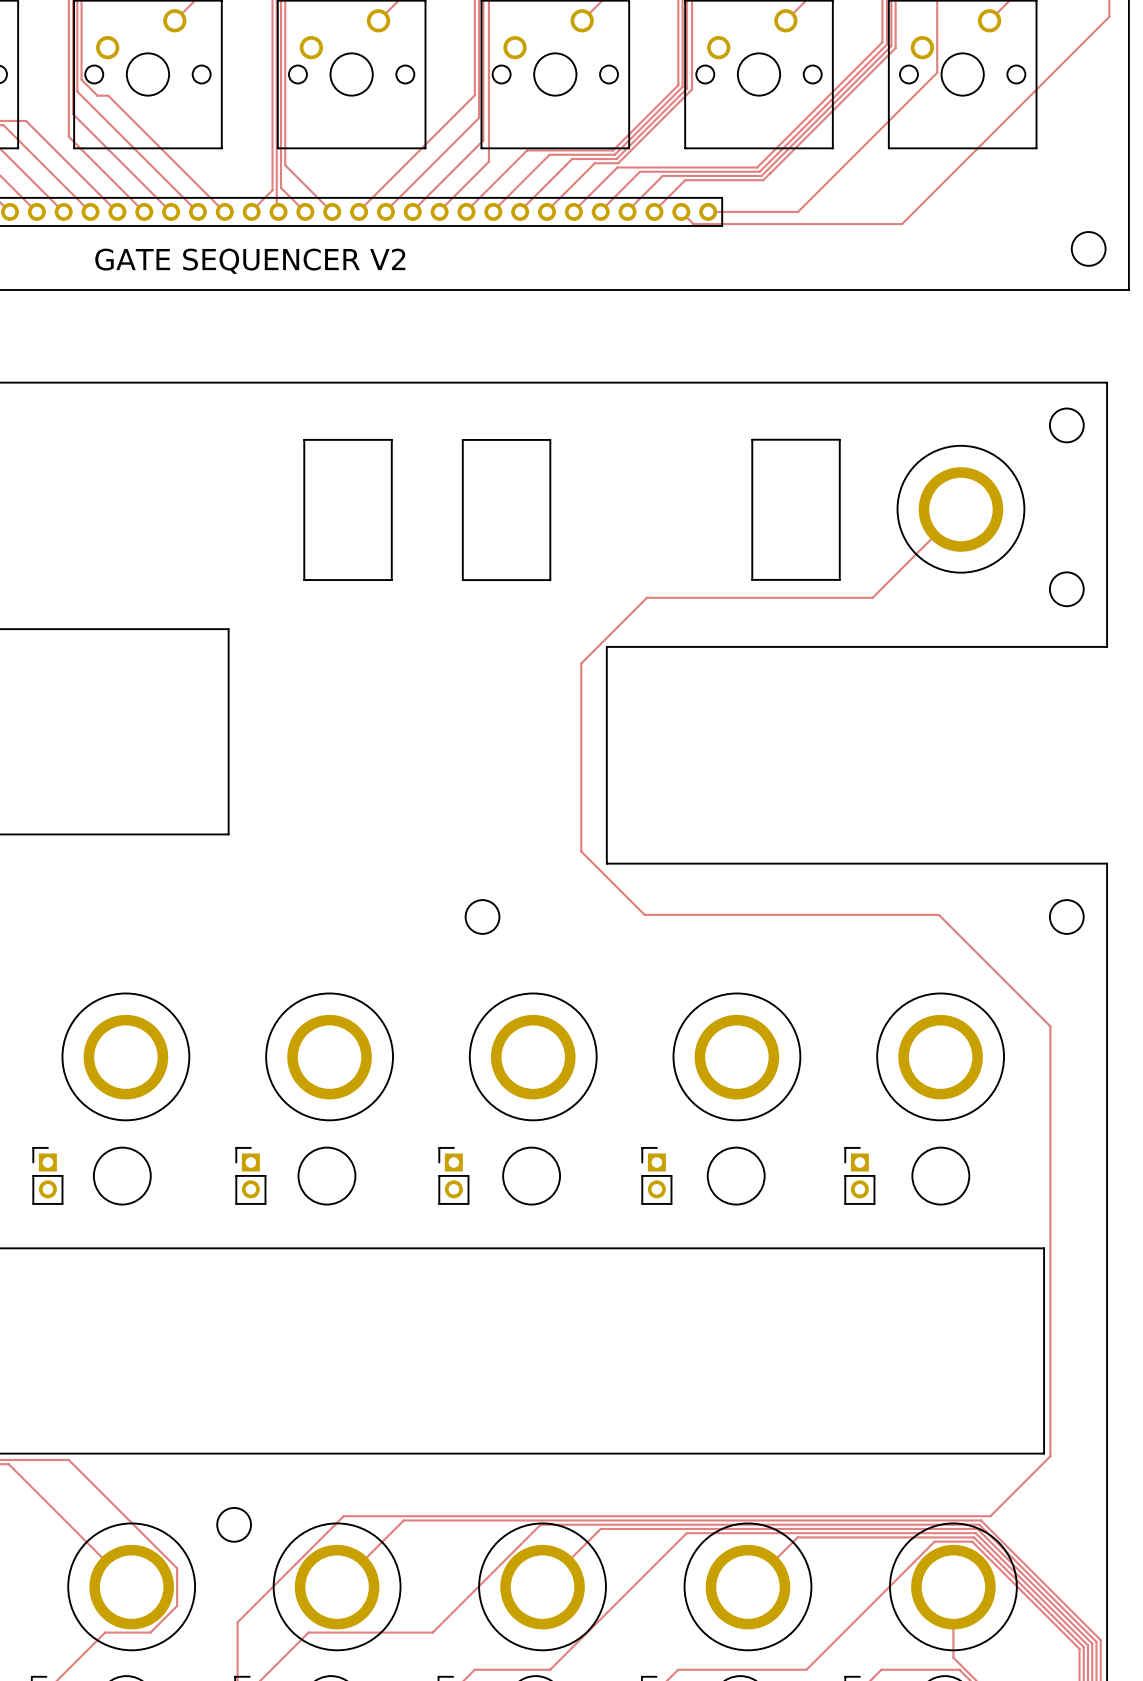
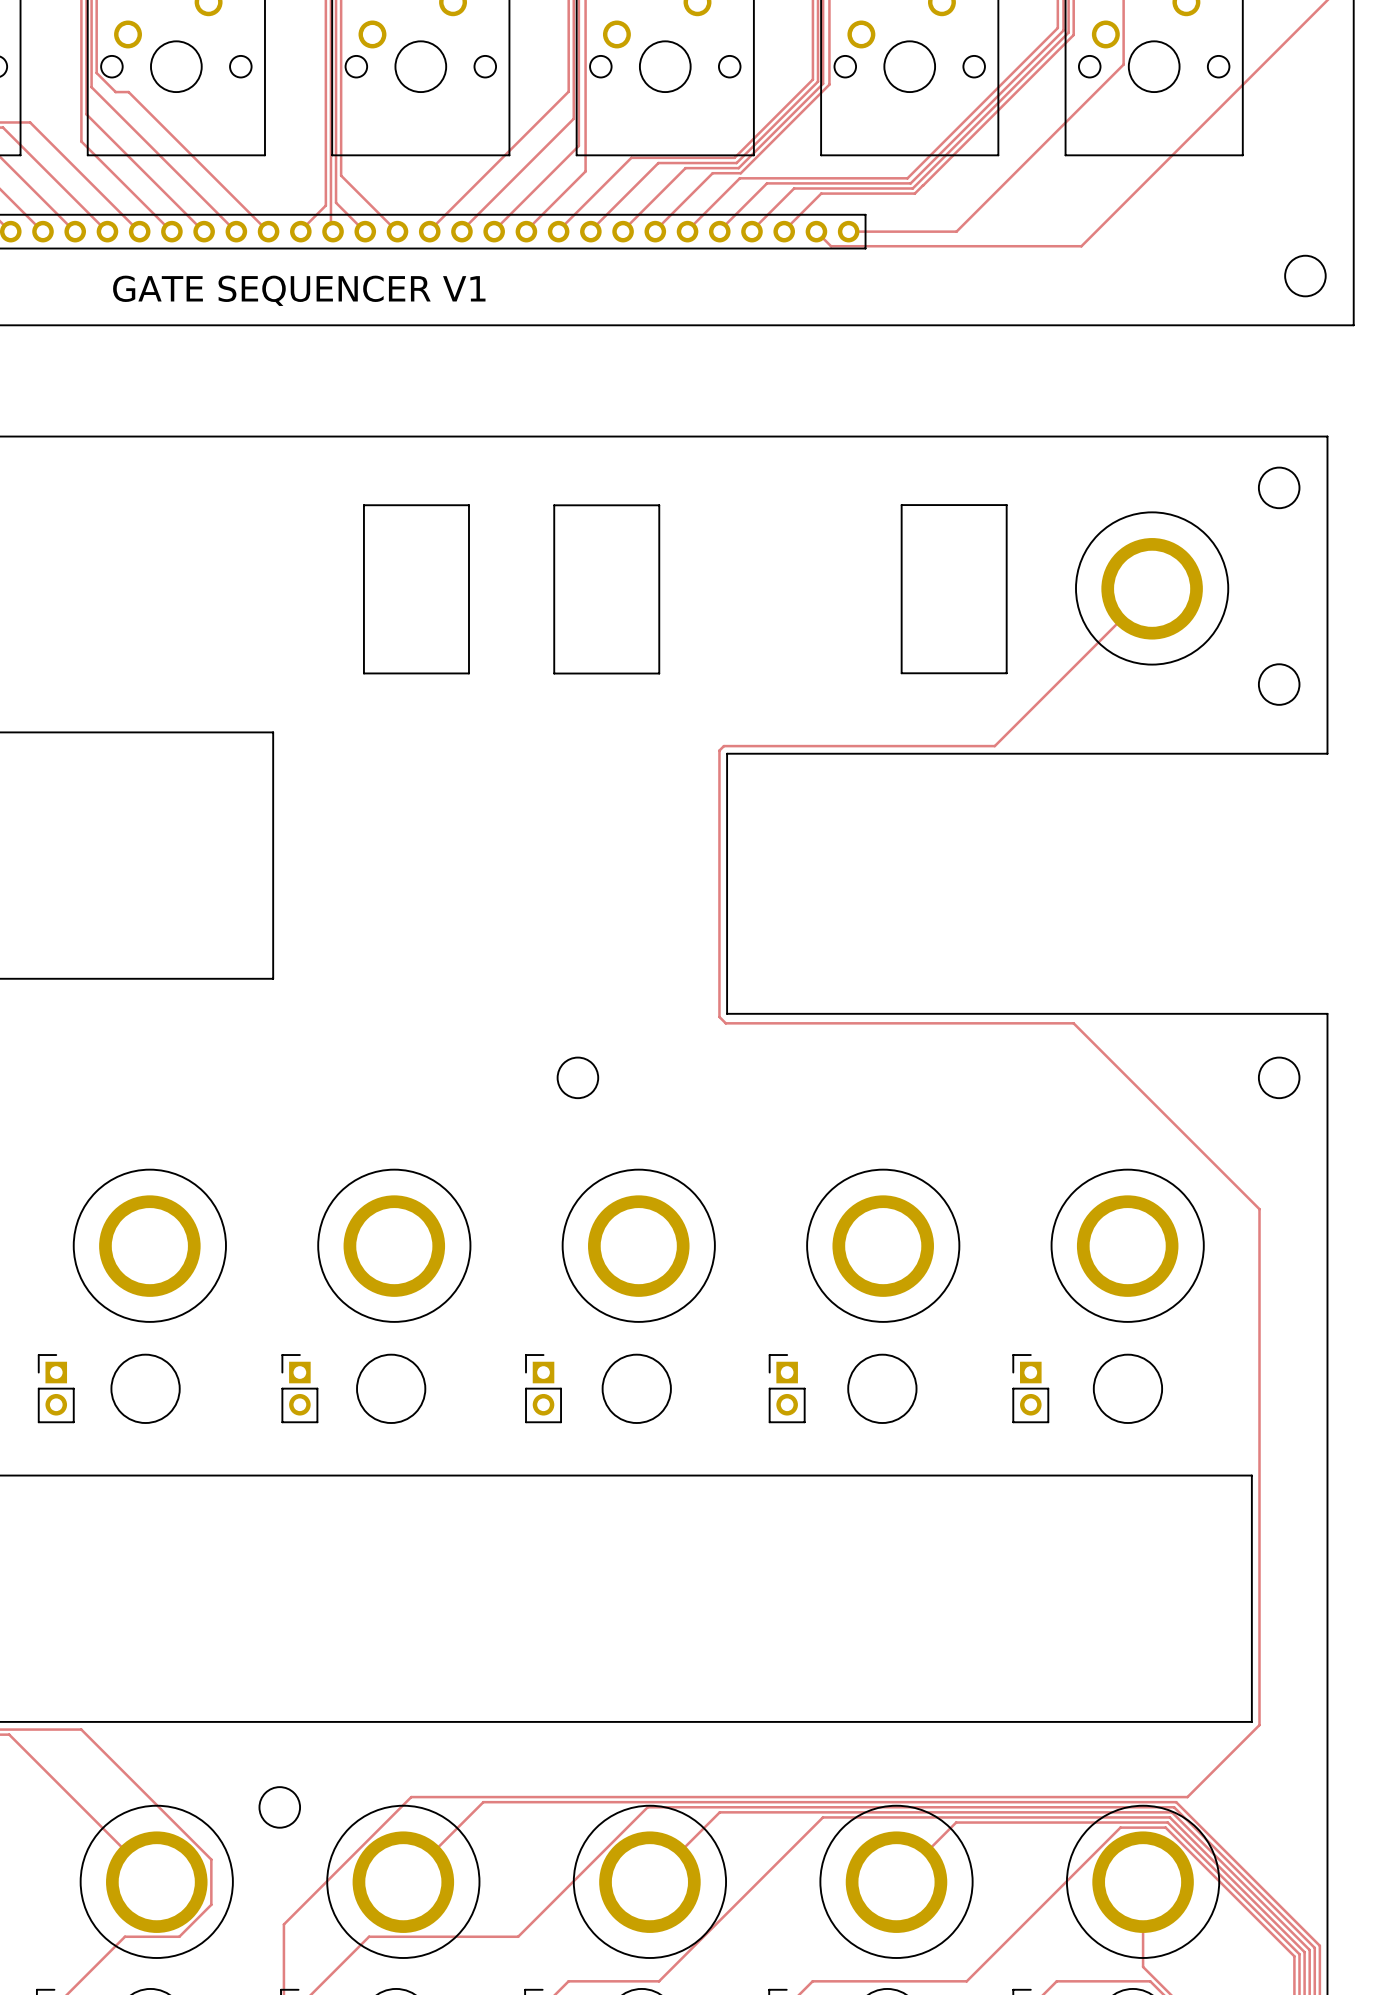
text: GATE SEQUENCER V2 (250, 261) -> GATE SEQUENCER V1 (299, 290)
track: (872, 597) (646, 597) (604, 640) -> (1046, 694) (994, 746) (723, 746)
track: (600, 644) (581, 663) (581, 851) (644, 914) (938, 914) -> (719, 750) (719, 1016) (725, 1023) (1073, 1023) (1125, 1075)

